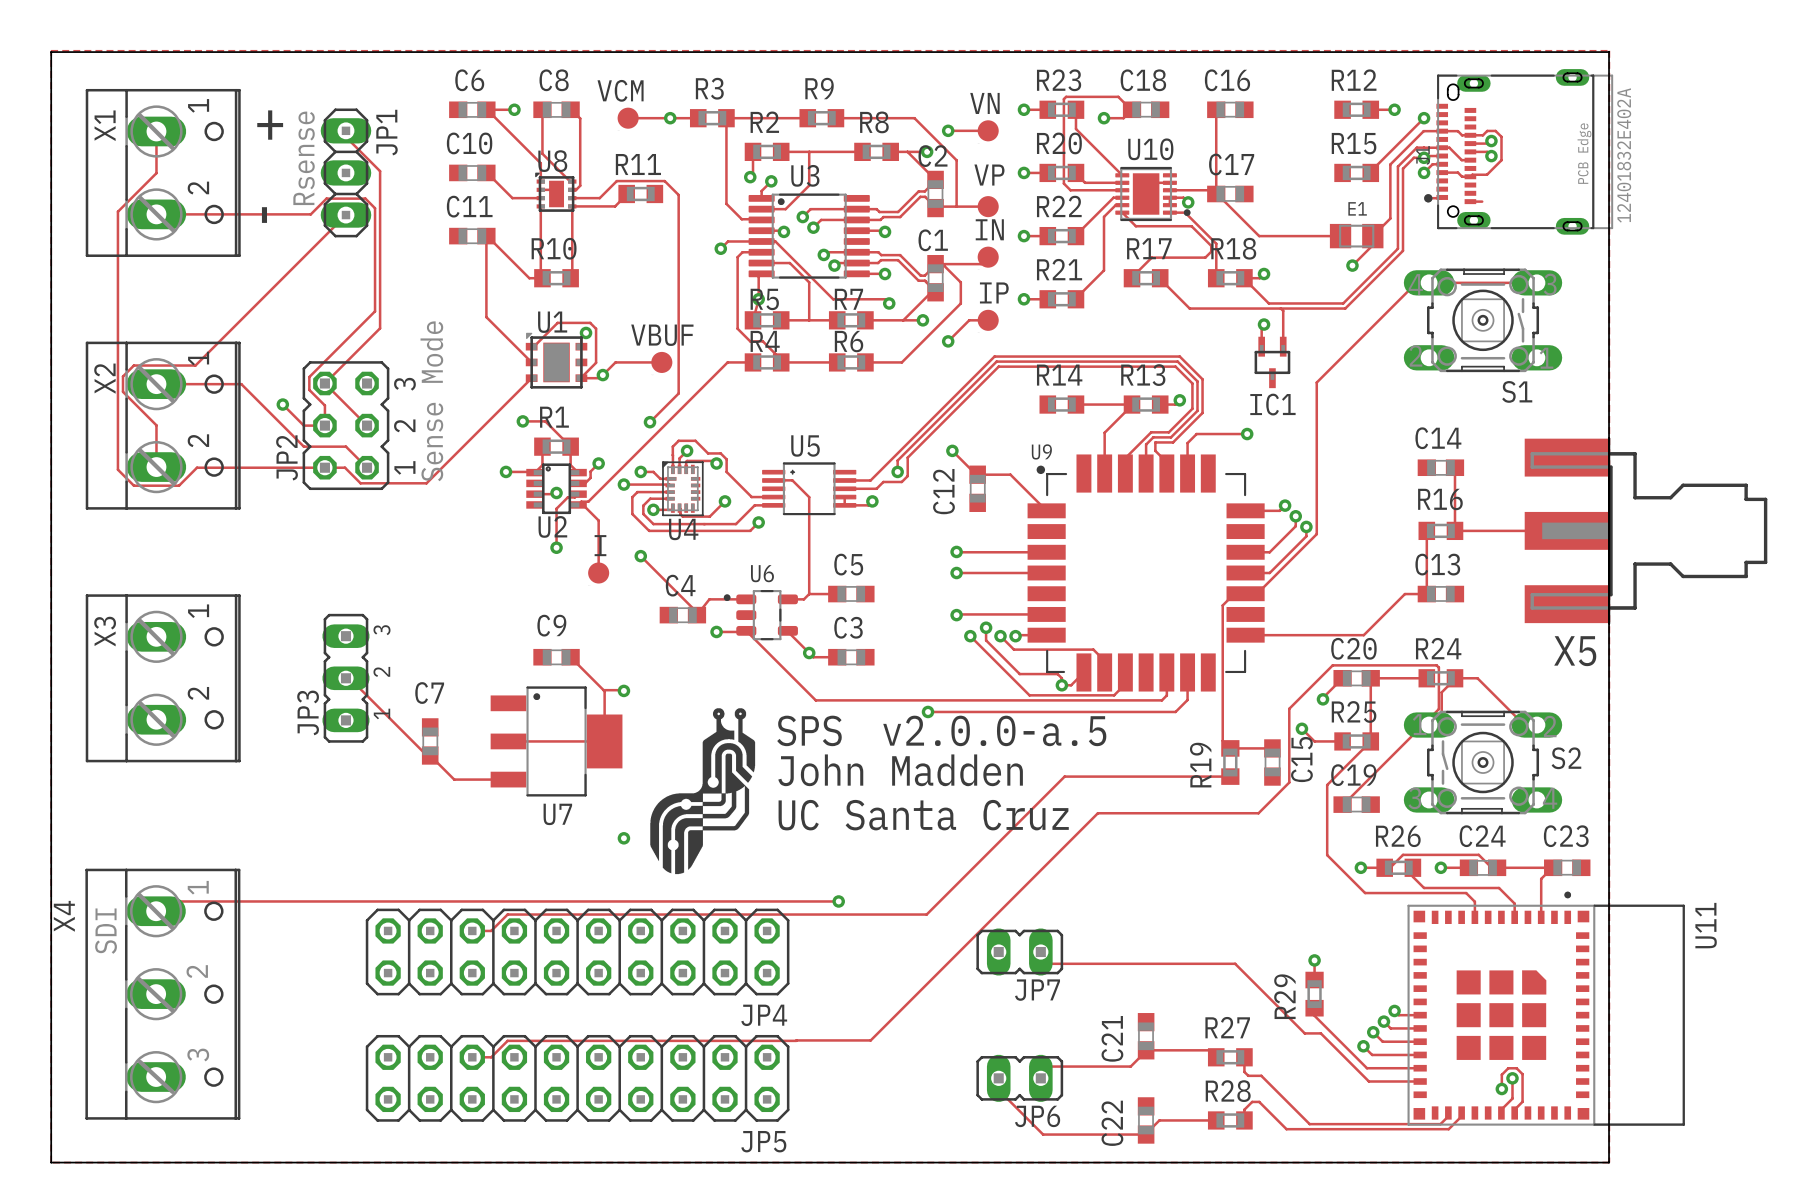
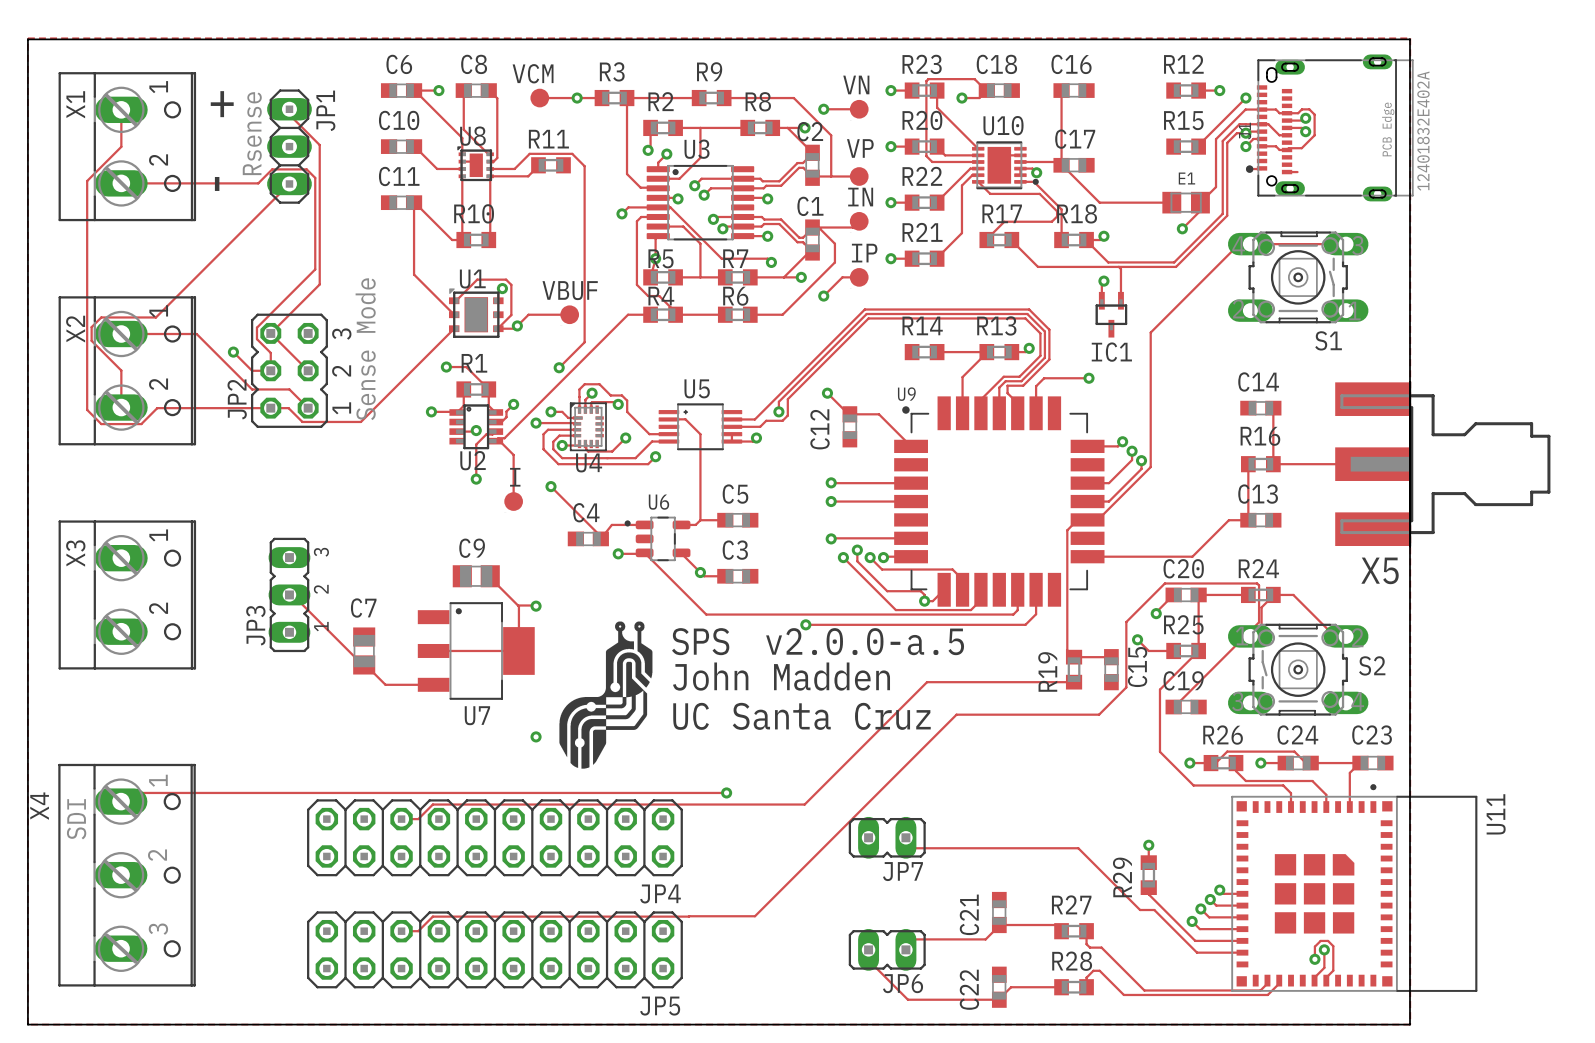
C9 footprint: [533, 648, 580, 666] -> [452, 565, 500, 588]
C7 footprint: [421, 718, 439, 765] -> [353, 627, 376, 675]

